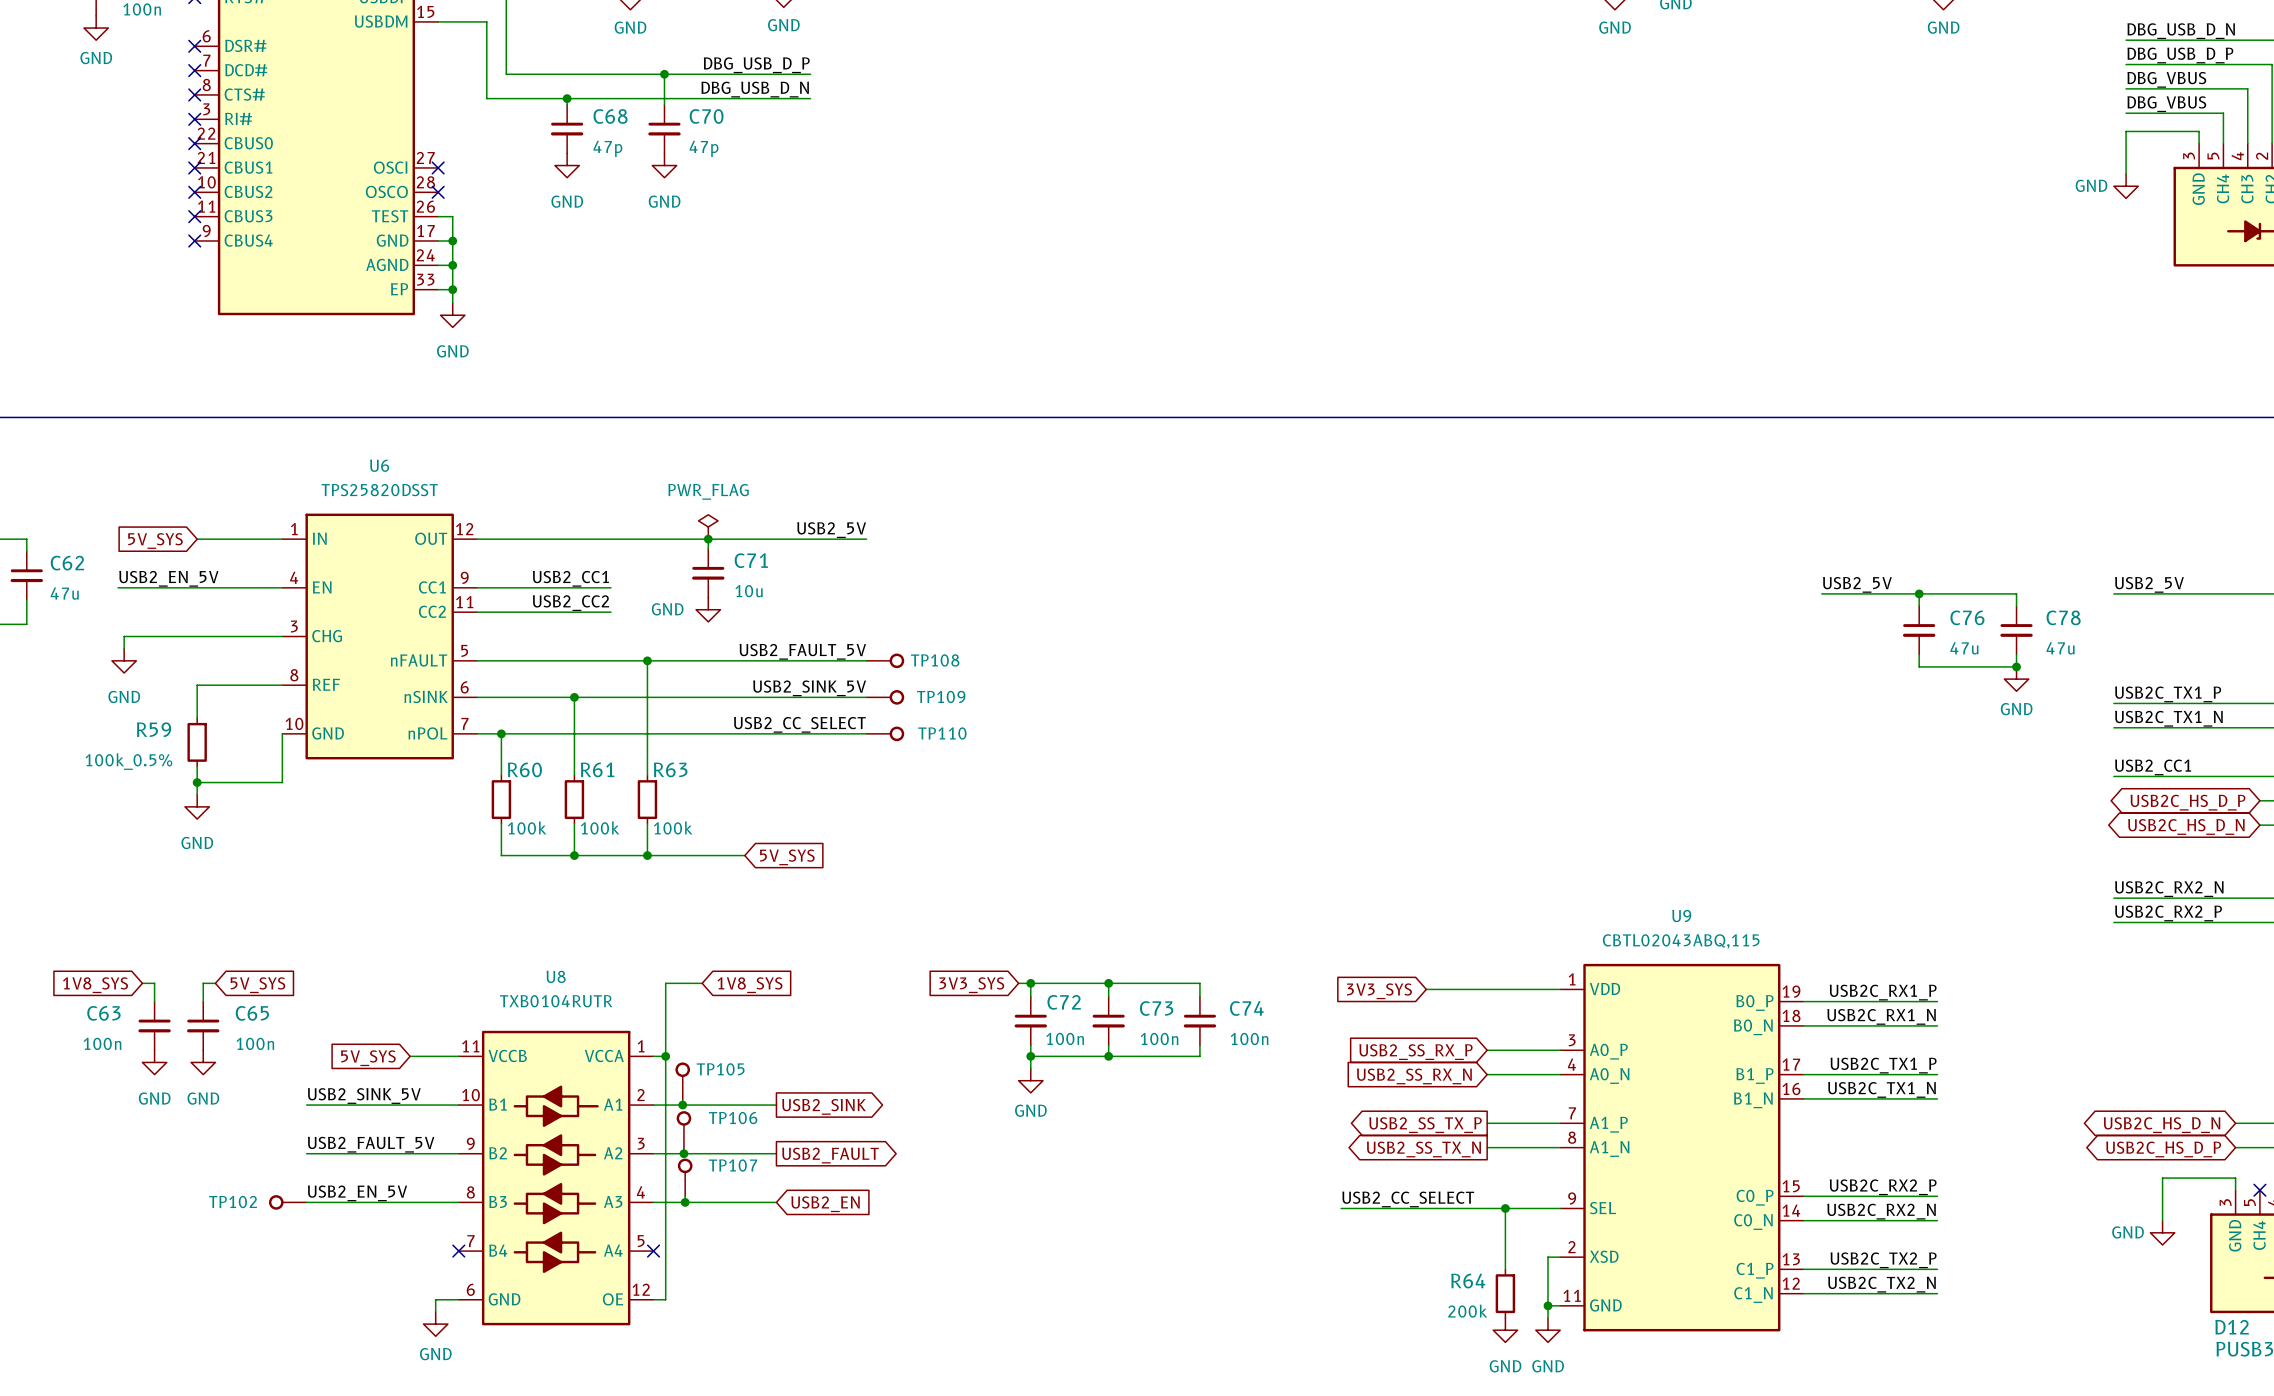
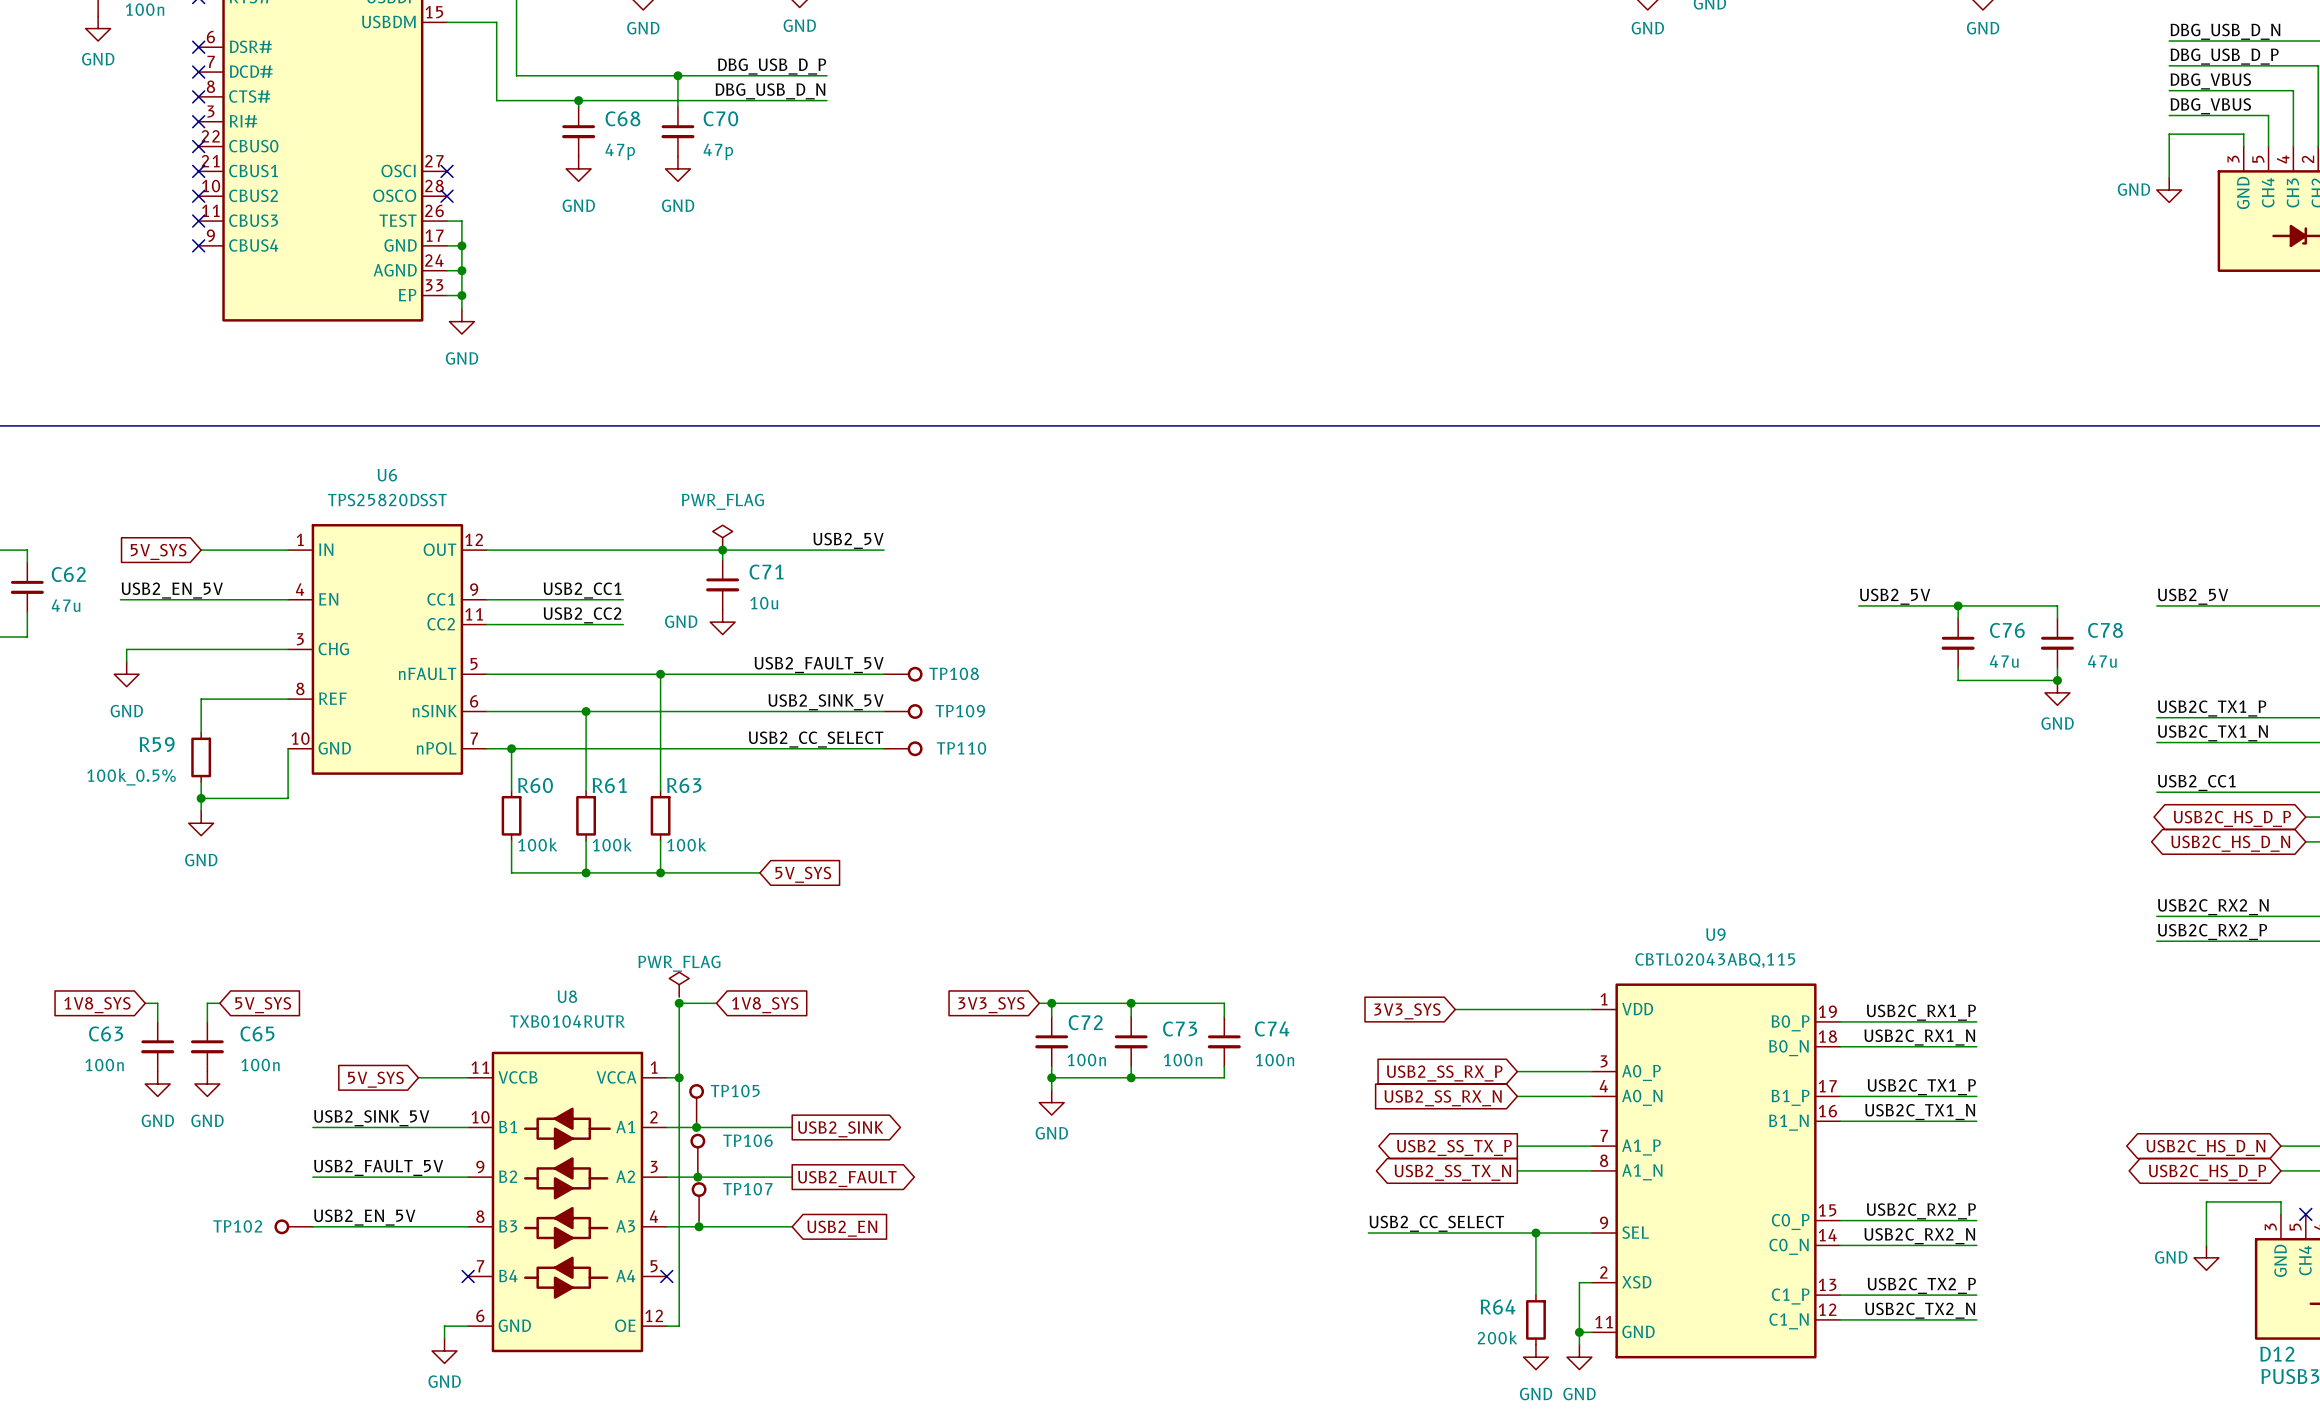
power symbol: none -> PWR_FLAG (679, 984)
junction: none -> (679, 1003)

